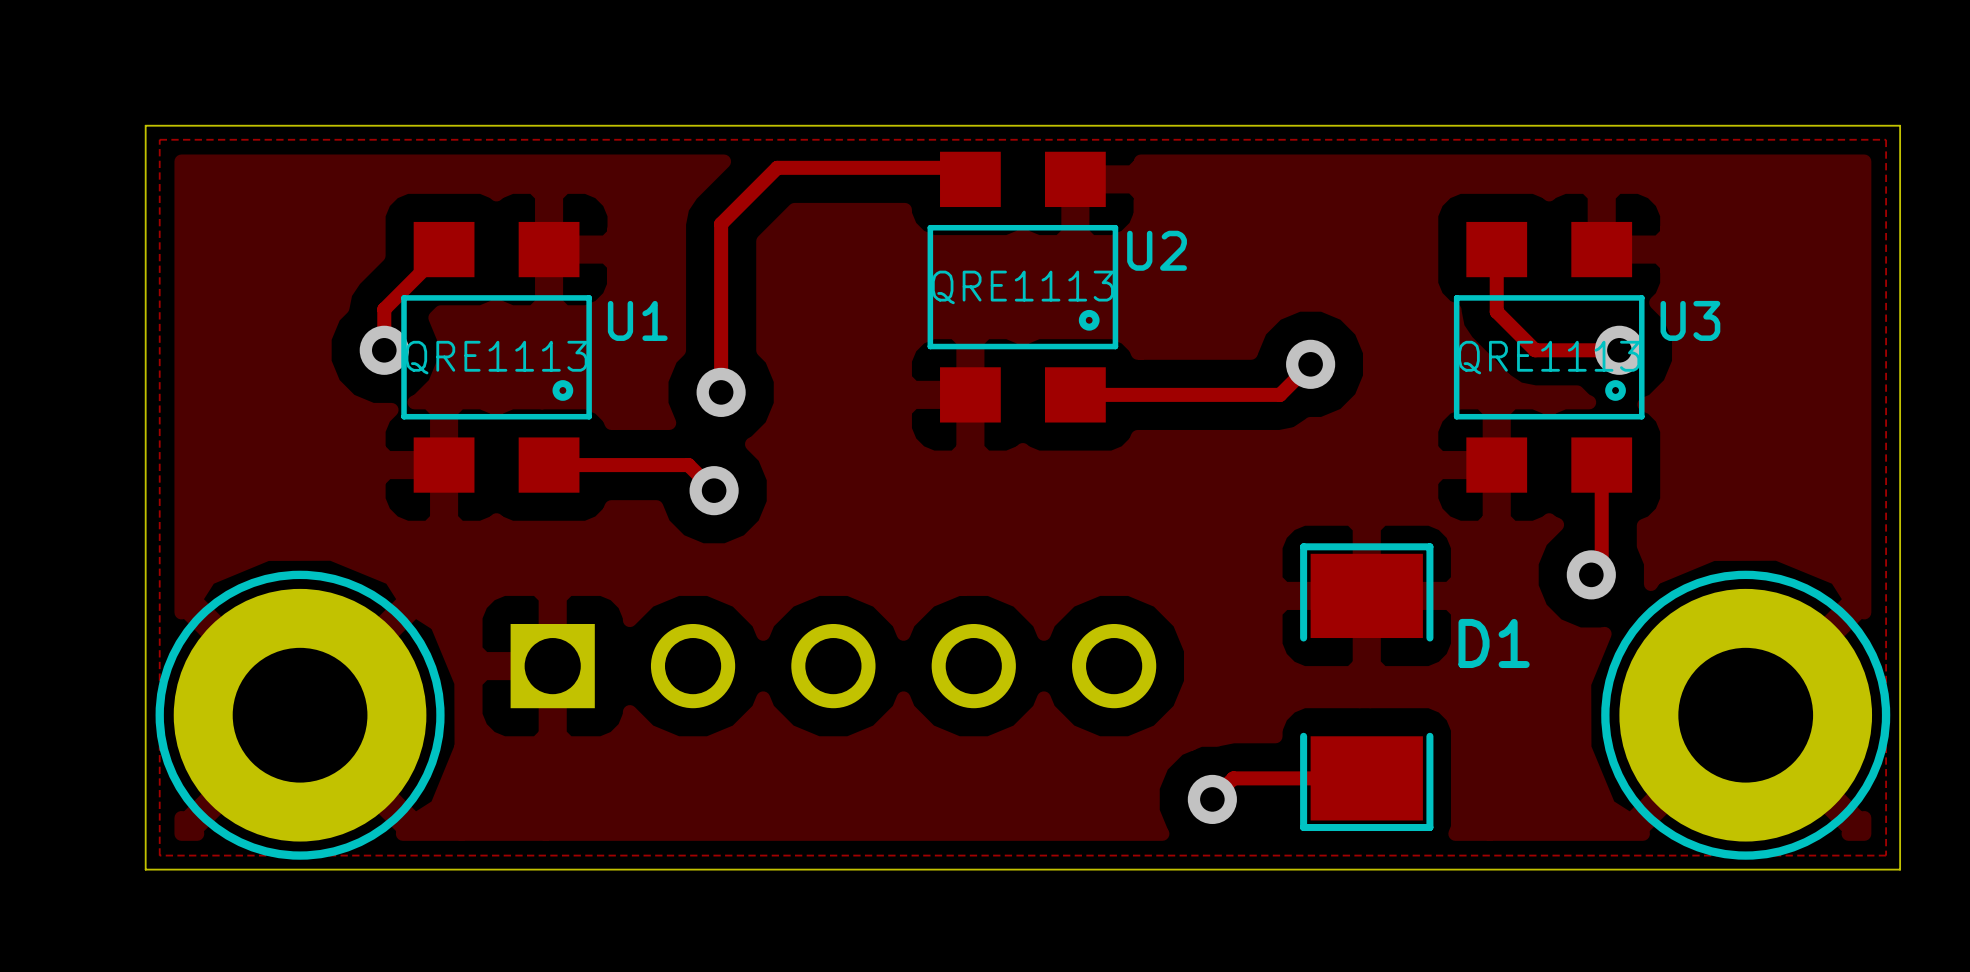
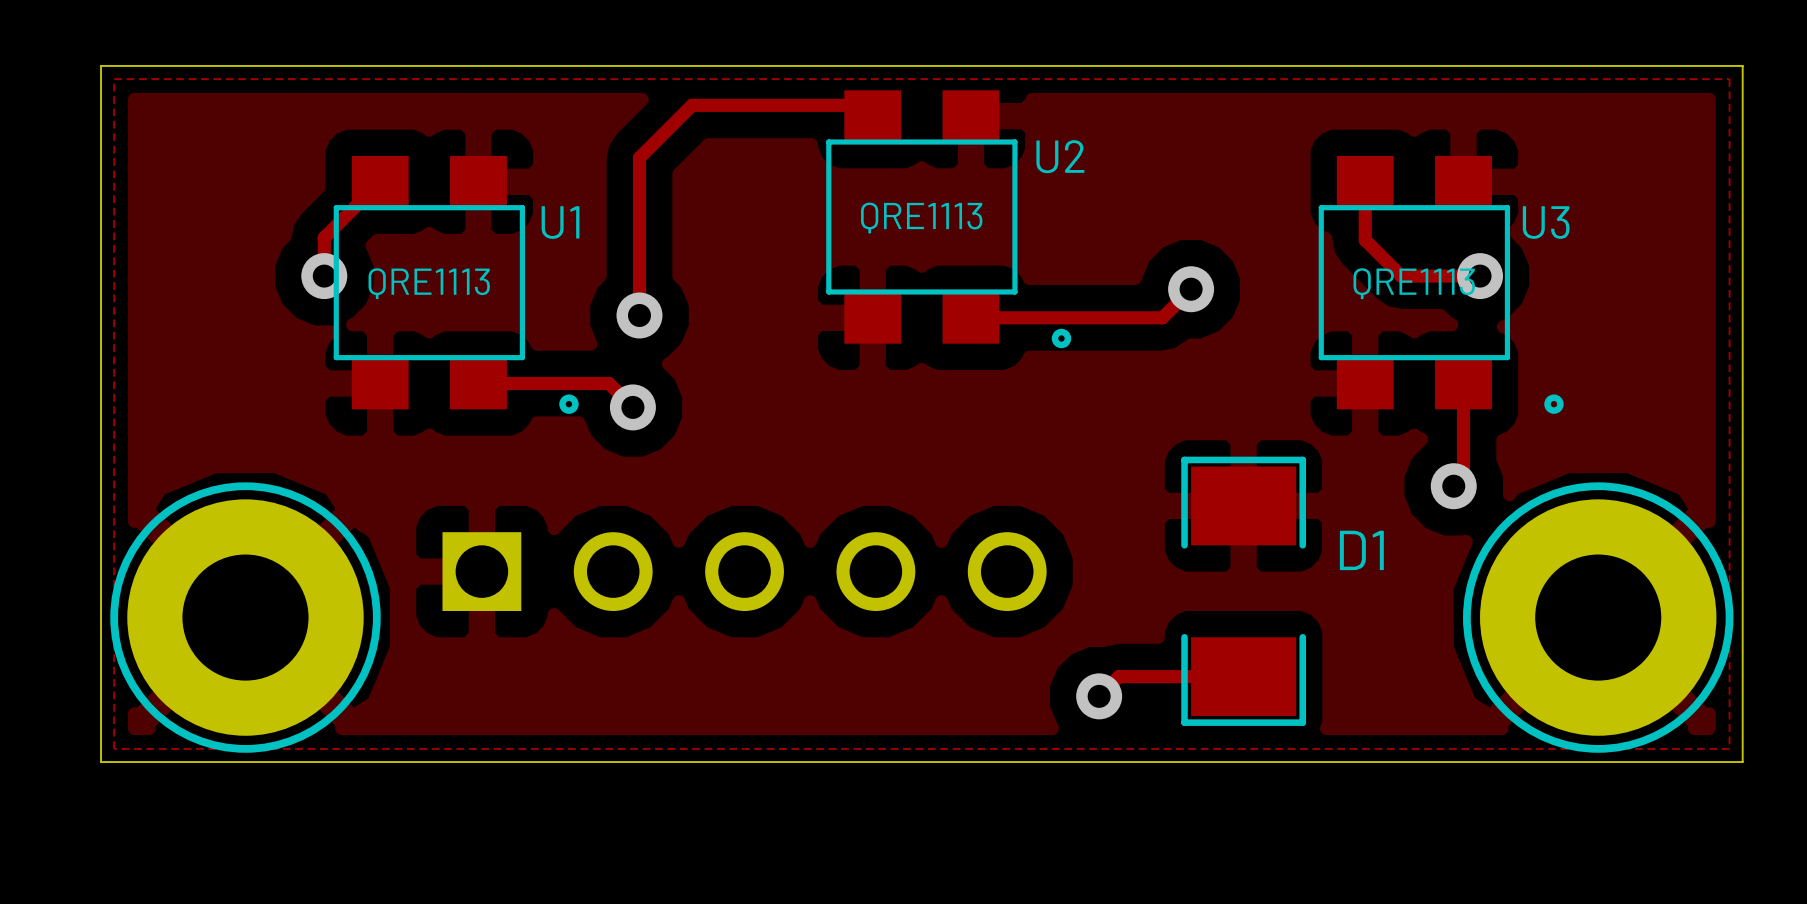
U2 footprint: [927, 151, 1119, 423] -> [826, 90, 1072, 349]
U1 footprint: [401, 221, 592, 493] -> [333, 155, 579, 414]
U3 footprint: [1453, 221, 1645, 493] -> [1318, 155, 1564, 414]

